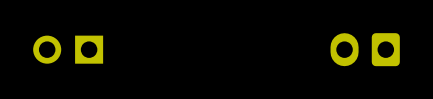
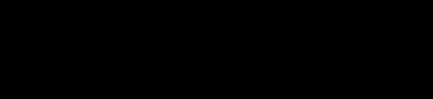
part: (68, 49) -> none
part: (365, 49) -> none

